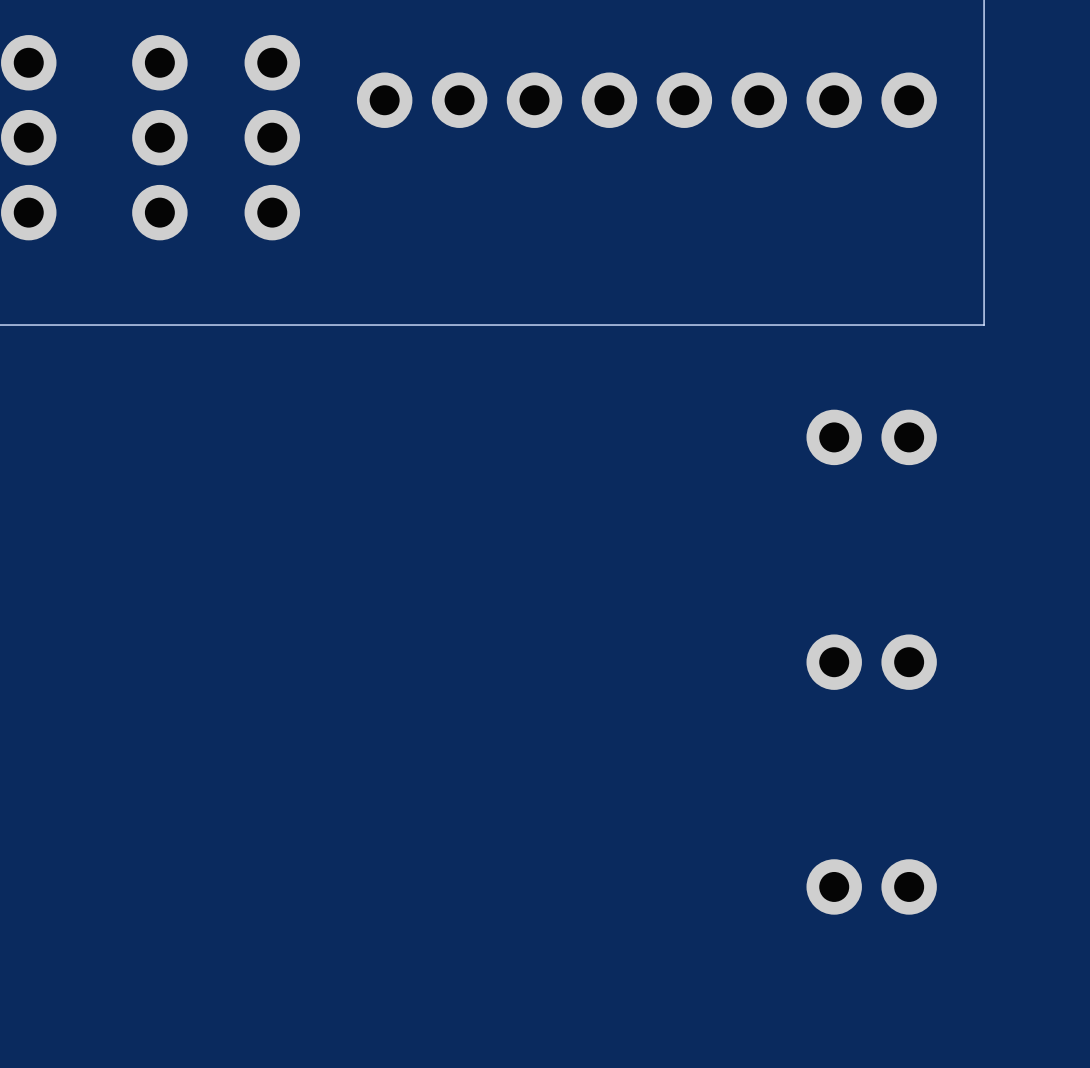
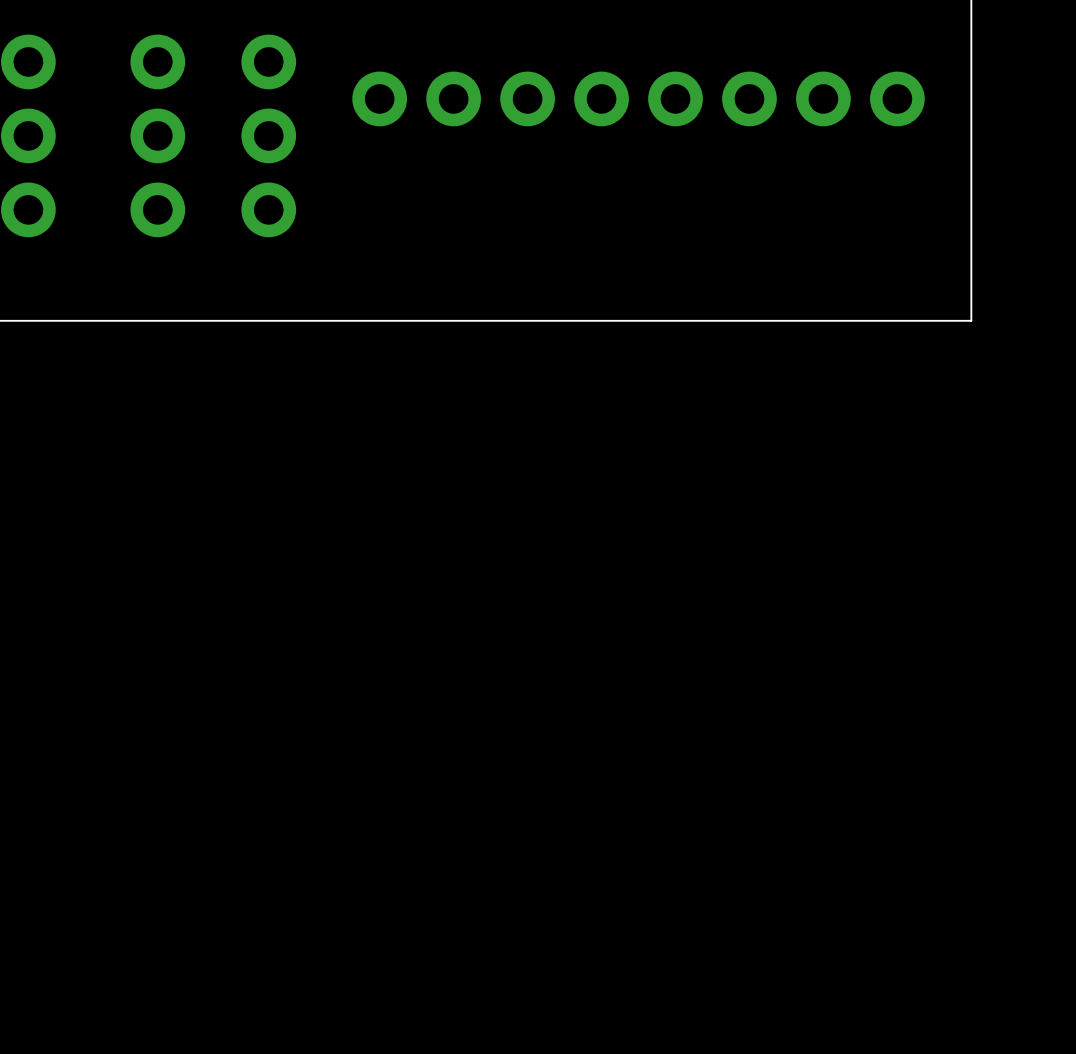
part: (871, 437) -> none
part: (871, 662) -> none
part: (871, 886) -> none

